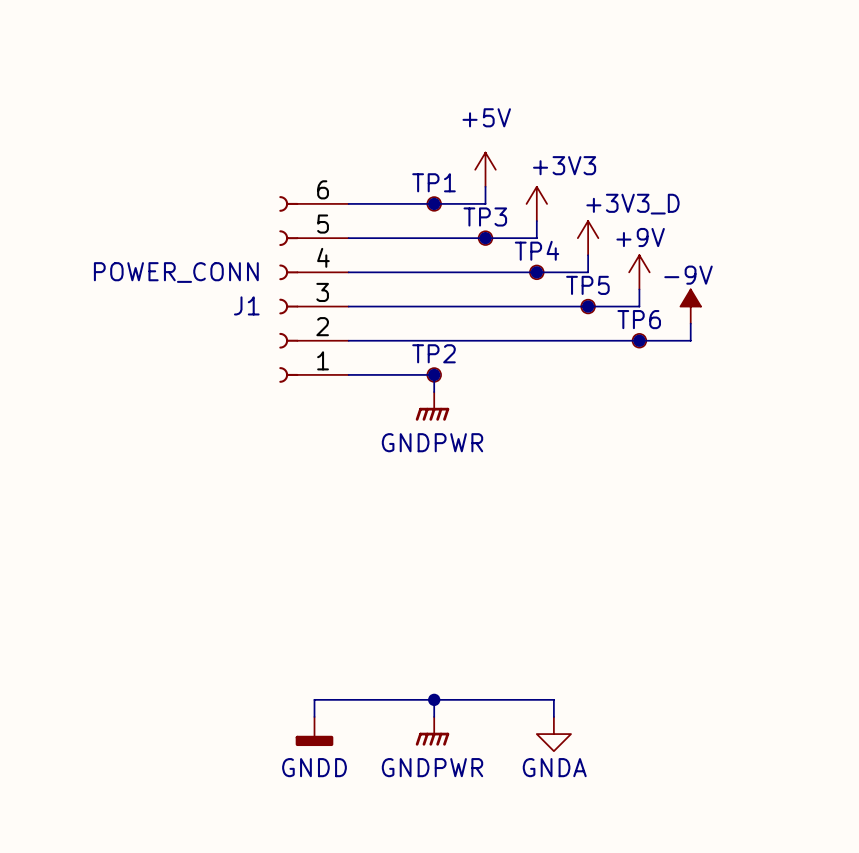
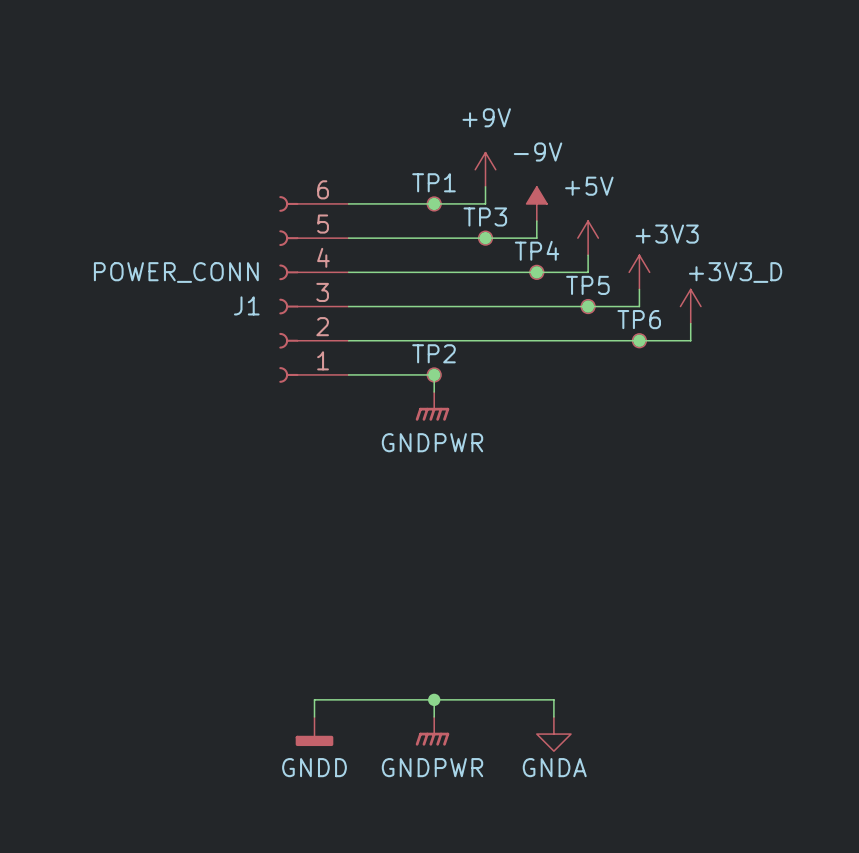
power symbol: +5V (485, 169) -> +9V (485, 169)
power symbol: +3V3 (536, 203) -> -9V (536, 203)
power symbol: +3V3_D (588, 238) -> +5V (588, 238)
power symbol: +9V (639, 272) -> +3V3 (639, 272)
power symbol: -9V (690, 306) -> +3V3_D (690, 306)

